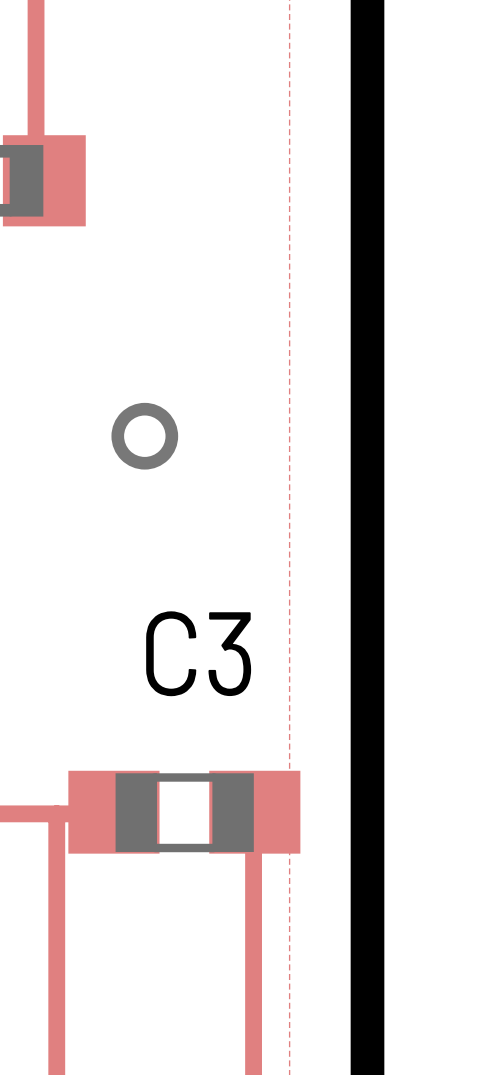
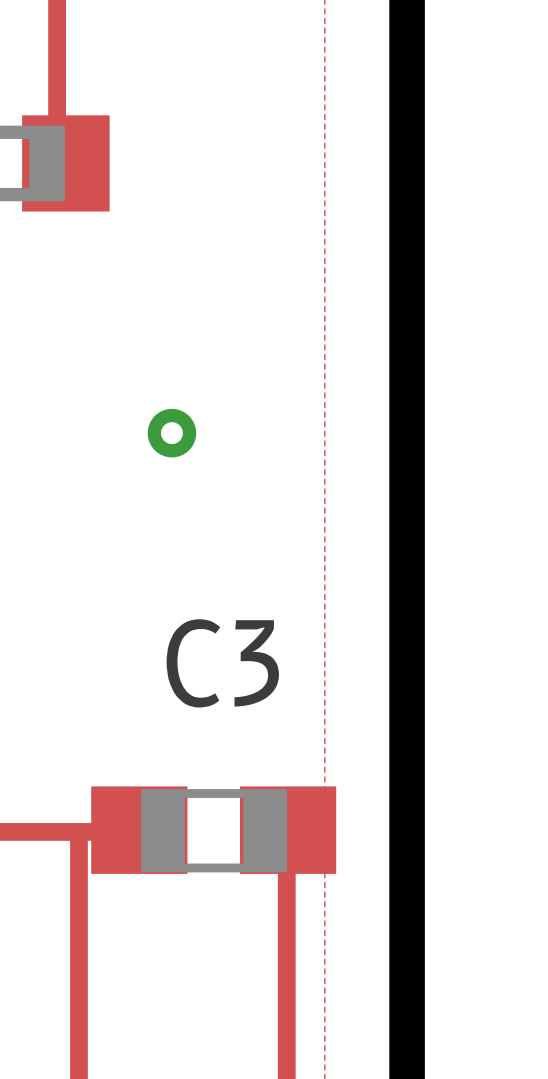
via size: [111, 402, 179, 470] -> [147, 408, 197, 458]

